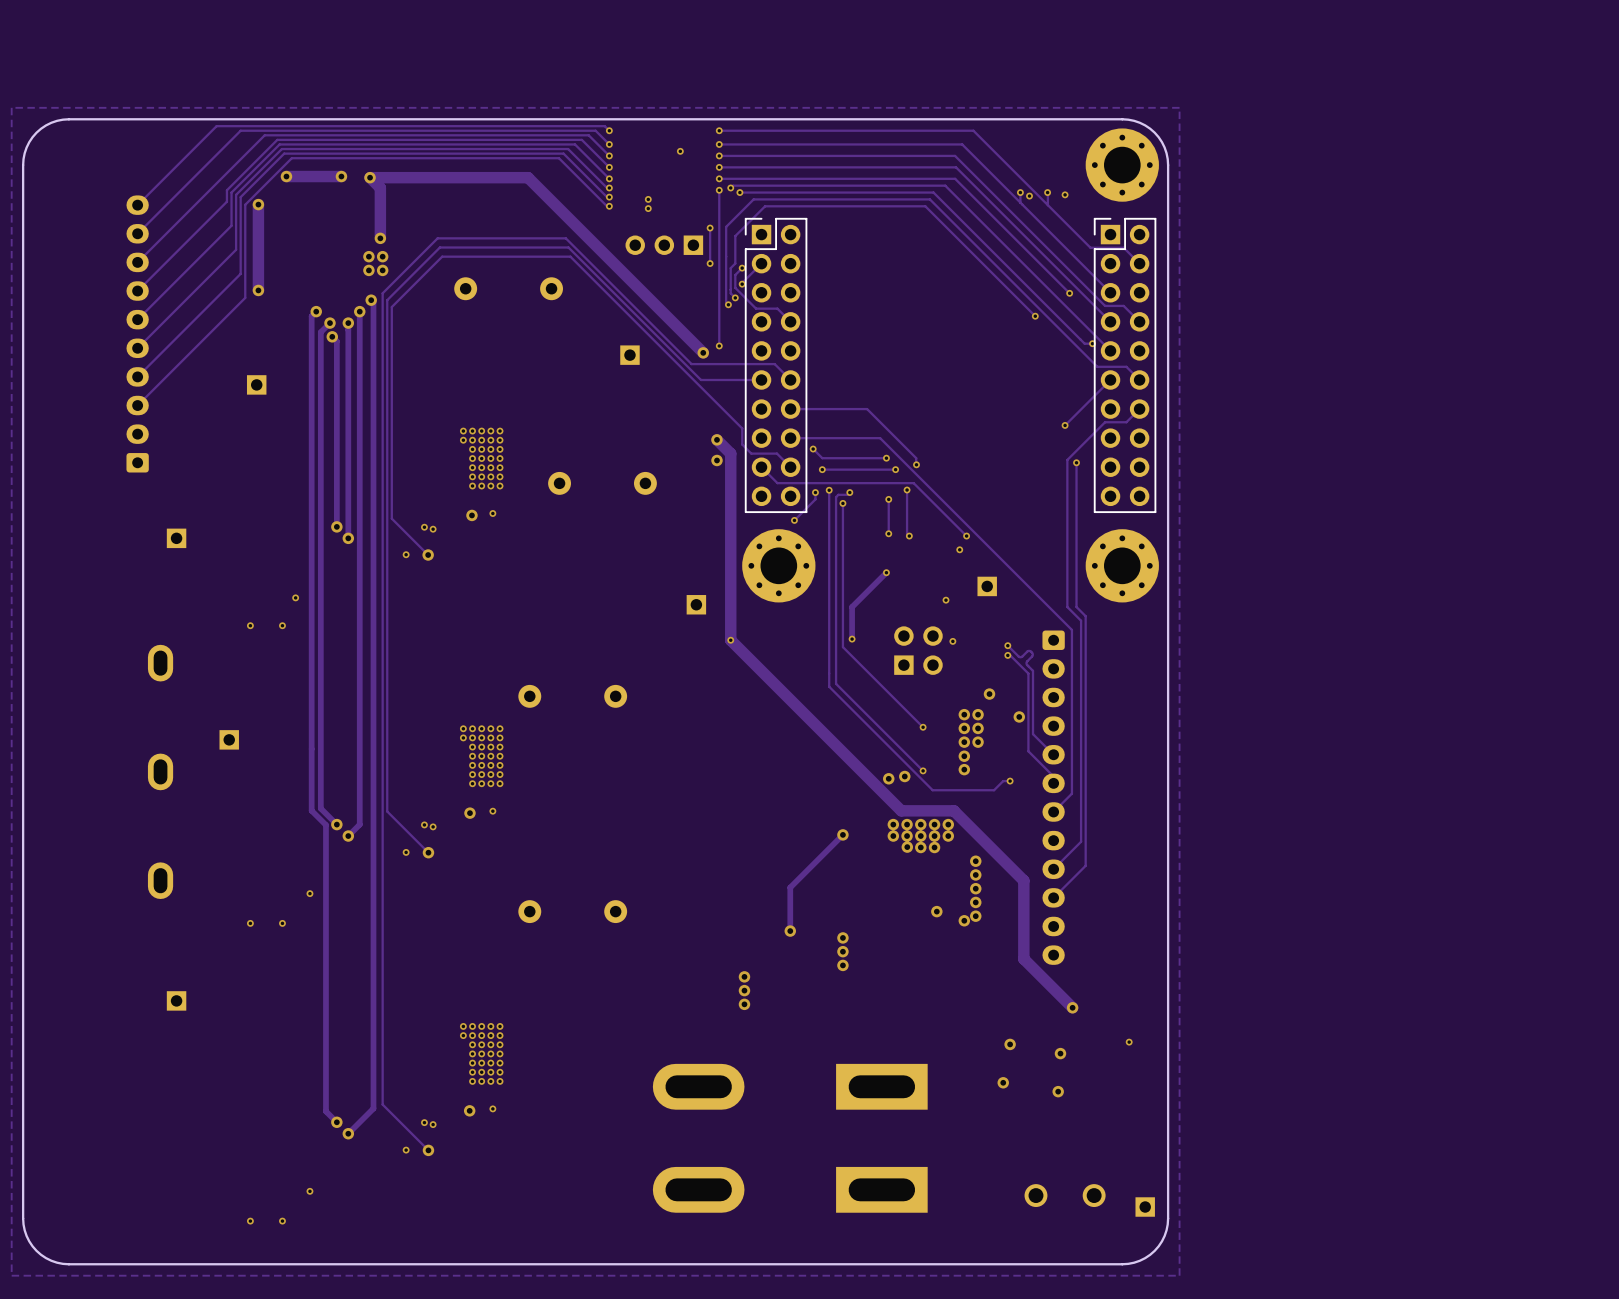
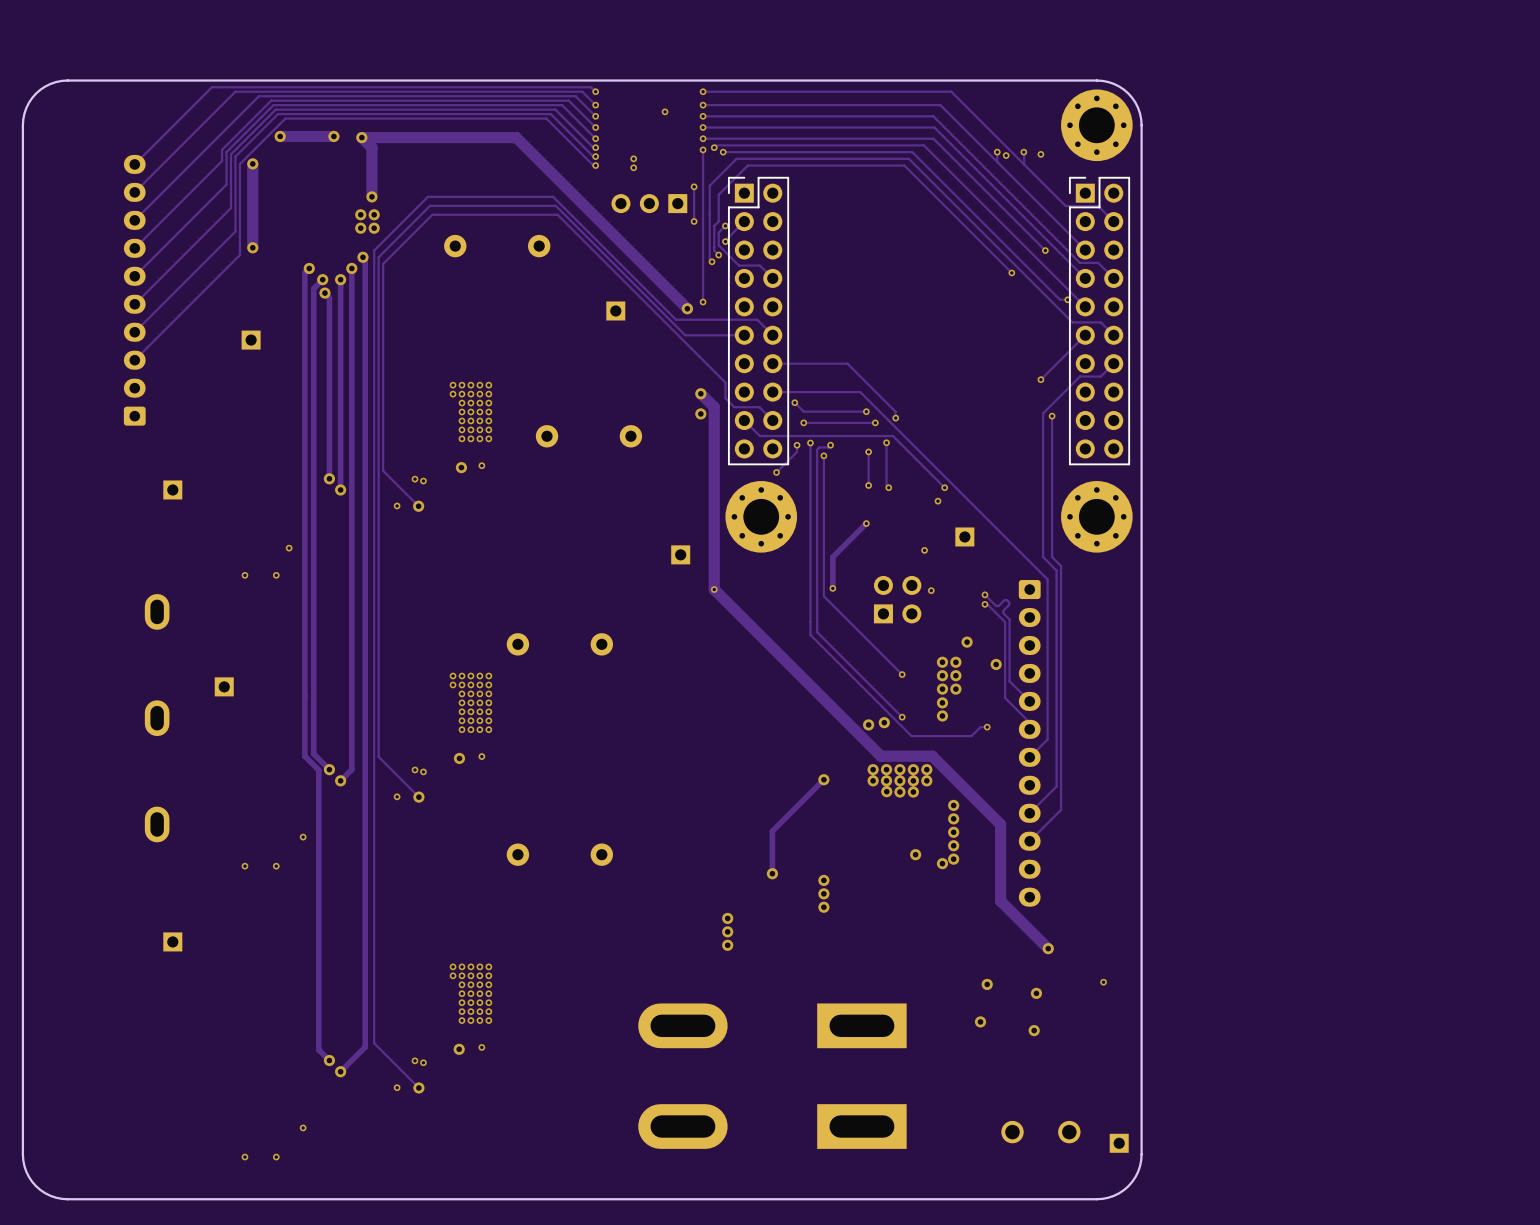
zone outline: (1179, 107) (11, 107) (11, 1275) (1179, 1275) (1179, 107) -> none

